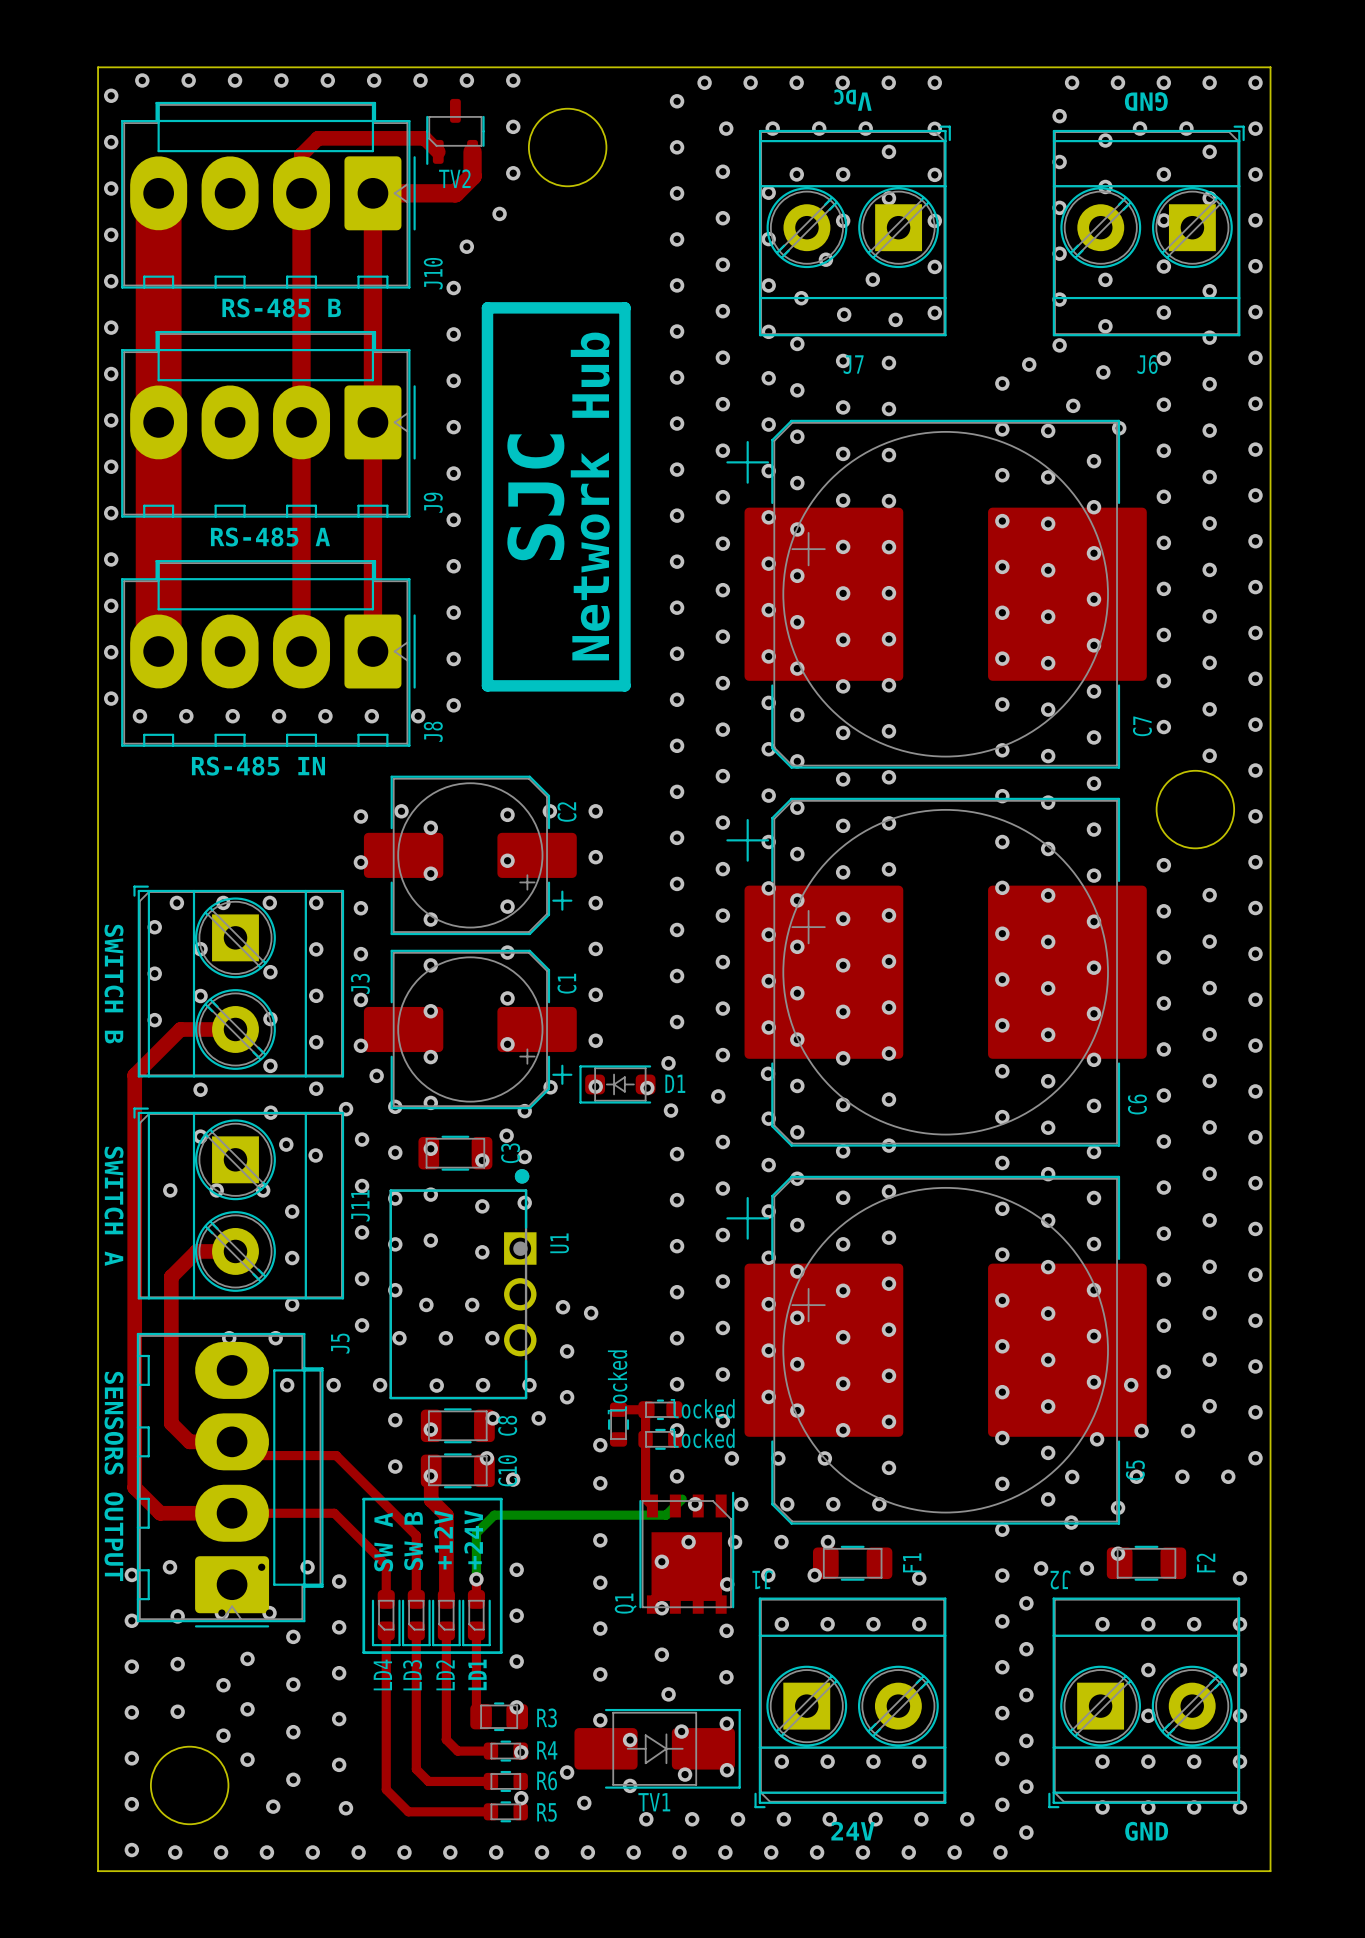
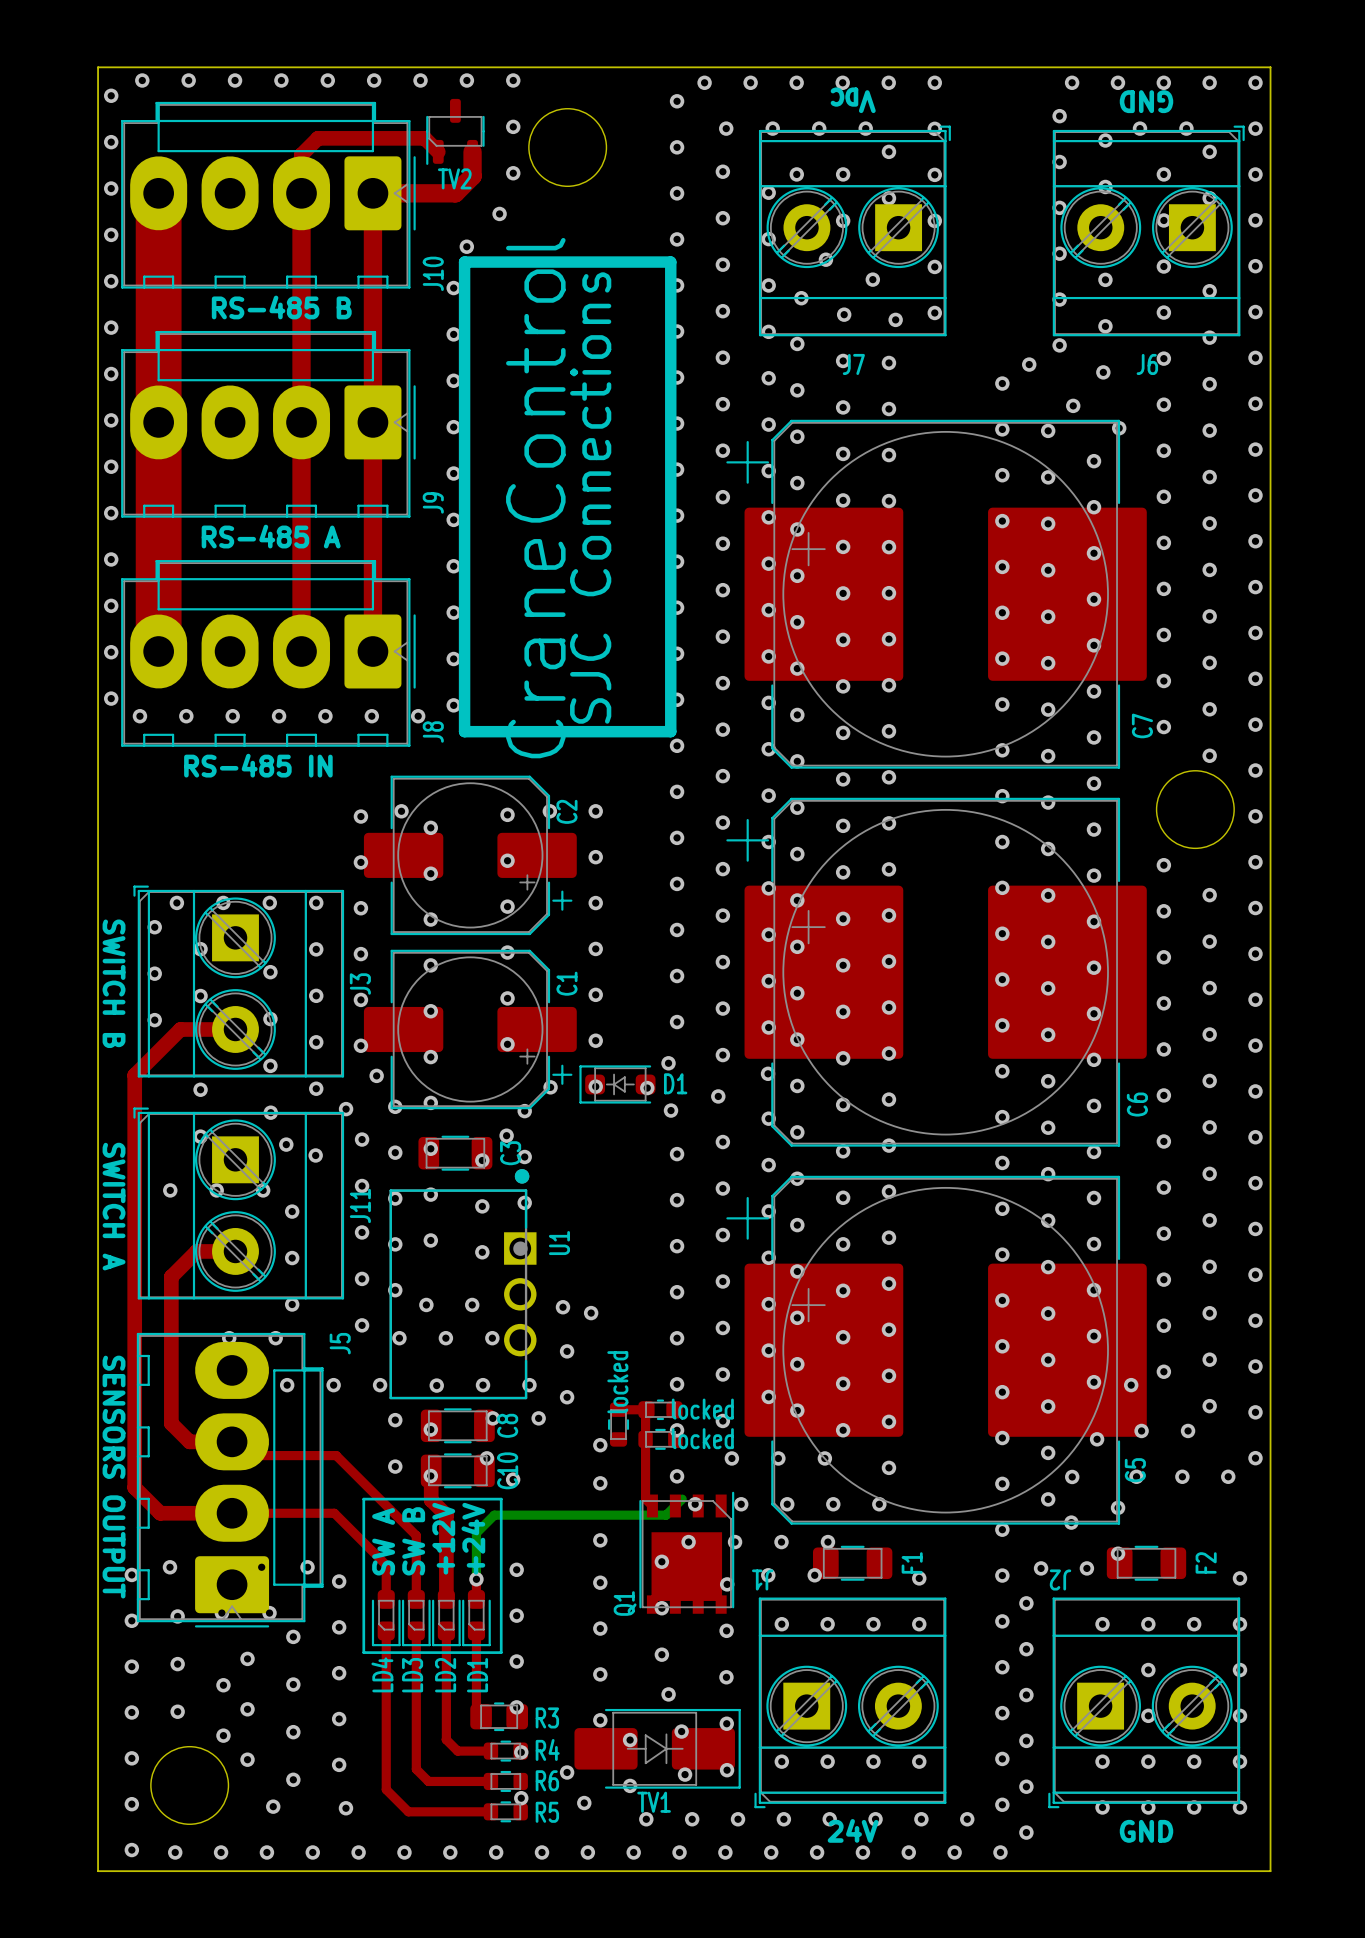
line: (487, 307) (624, 307) (624, 685) (487, 685) (487, 307) -> (464, 262) (464, 731) (670, 731) (670, 262) (464, 262)
text: Network Hub (590, 496) -> SJC Connections (590, 498)
text: SJC (535, 497) -> CraneControl (535, 498)

